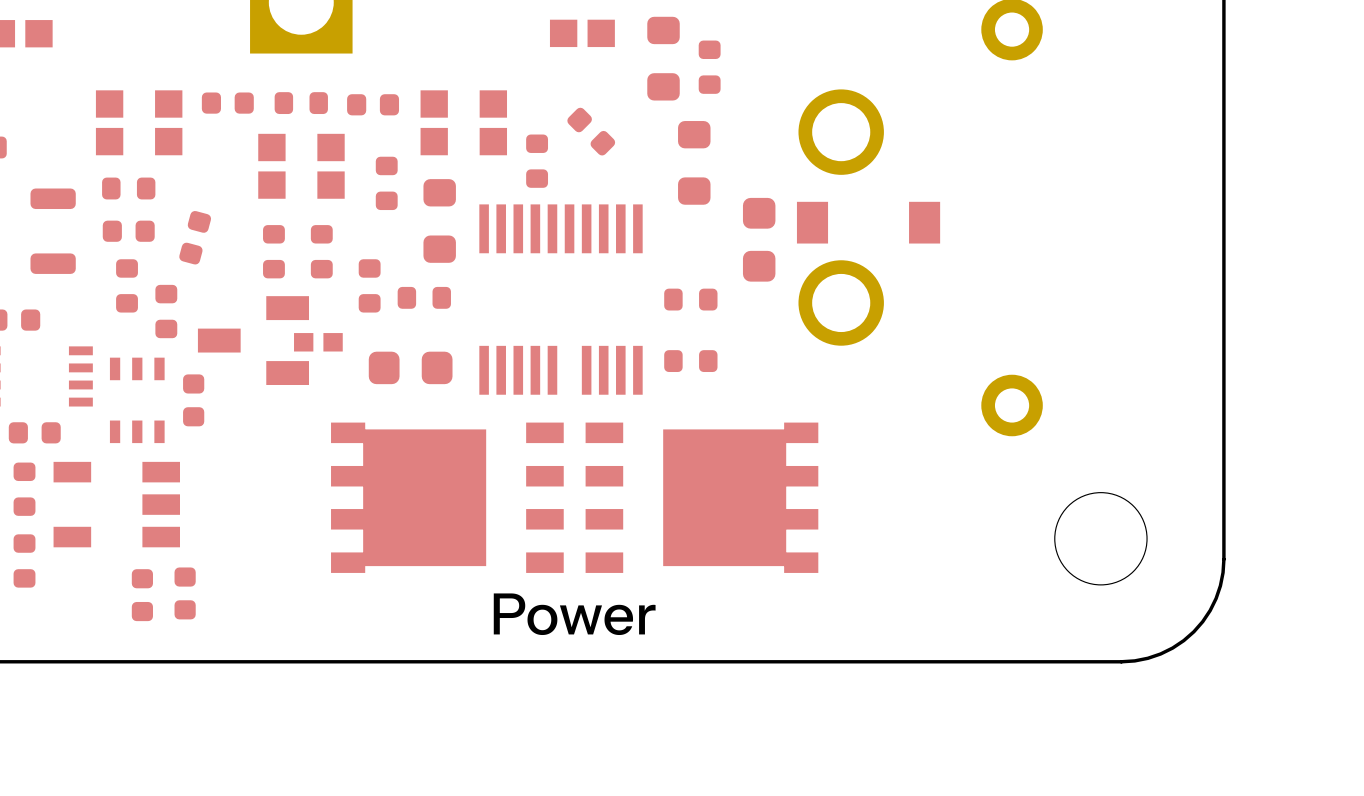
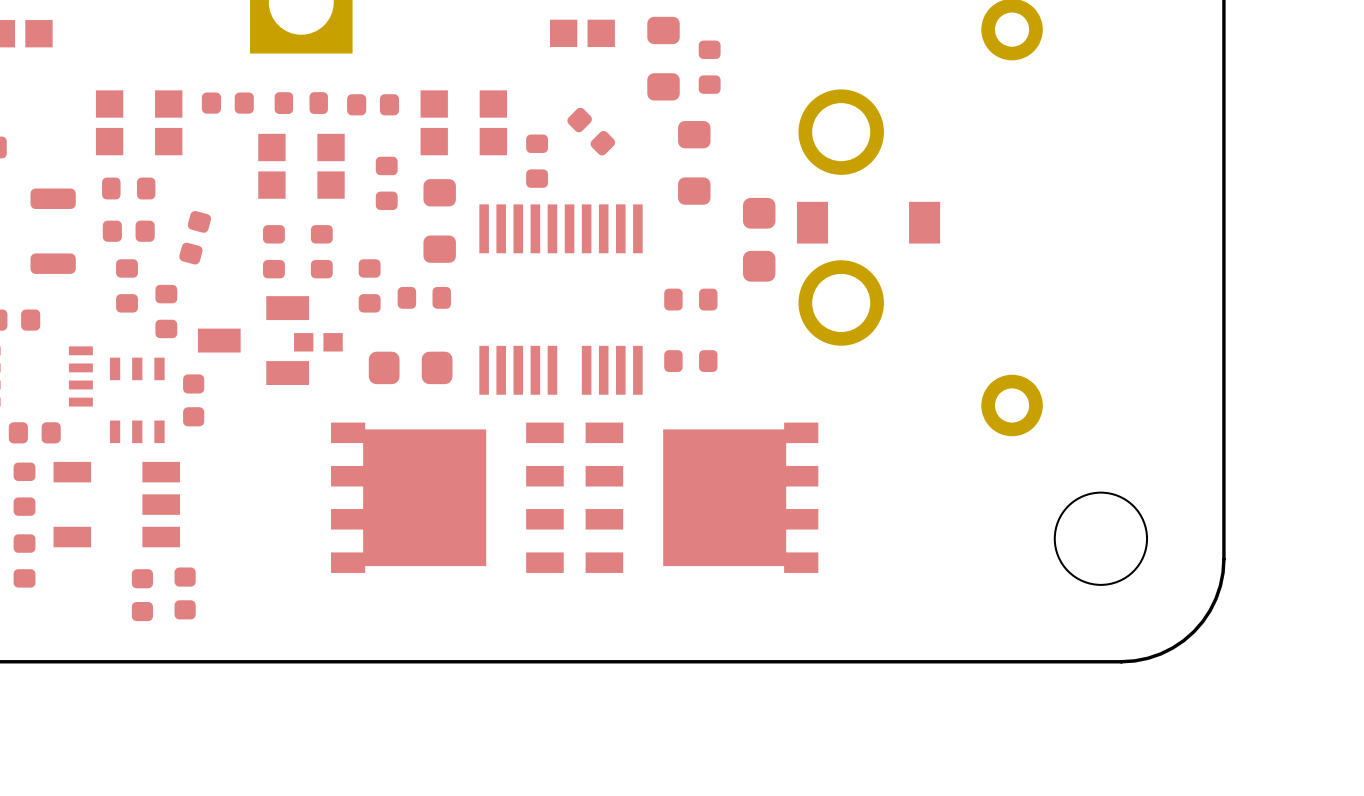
drawing: [493, 593, 656, 636] -> none

